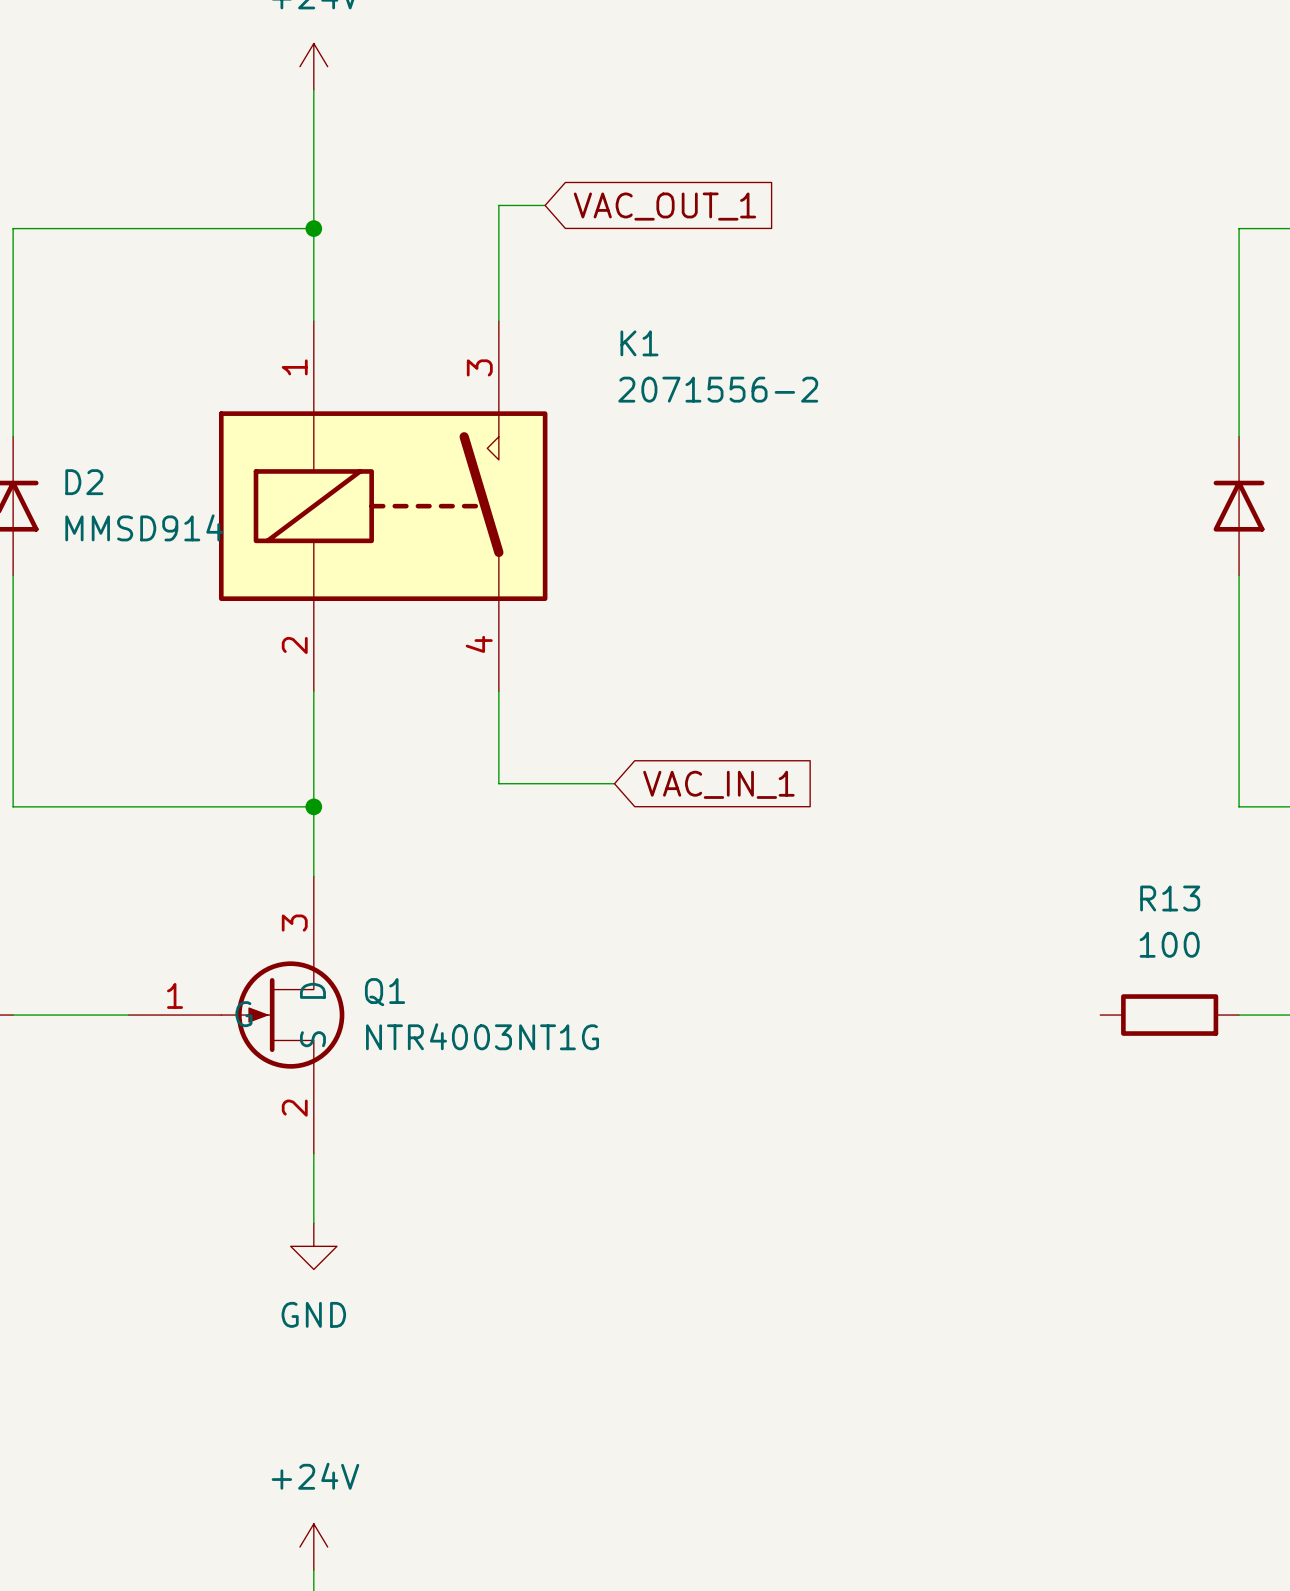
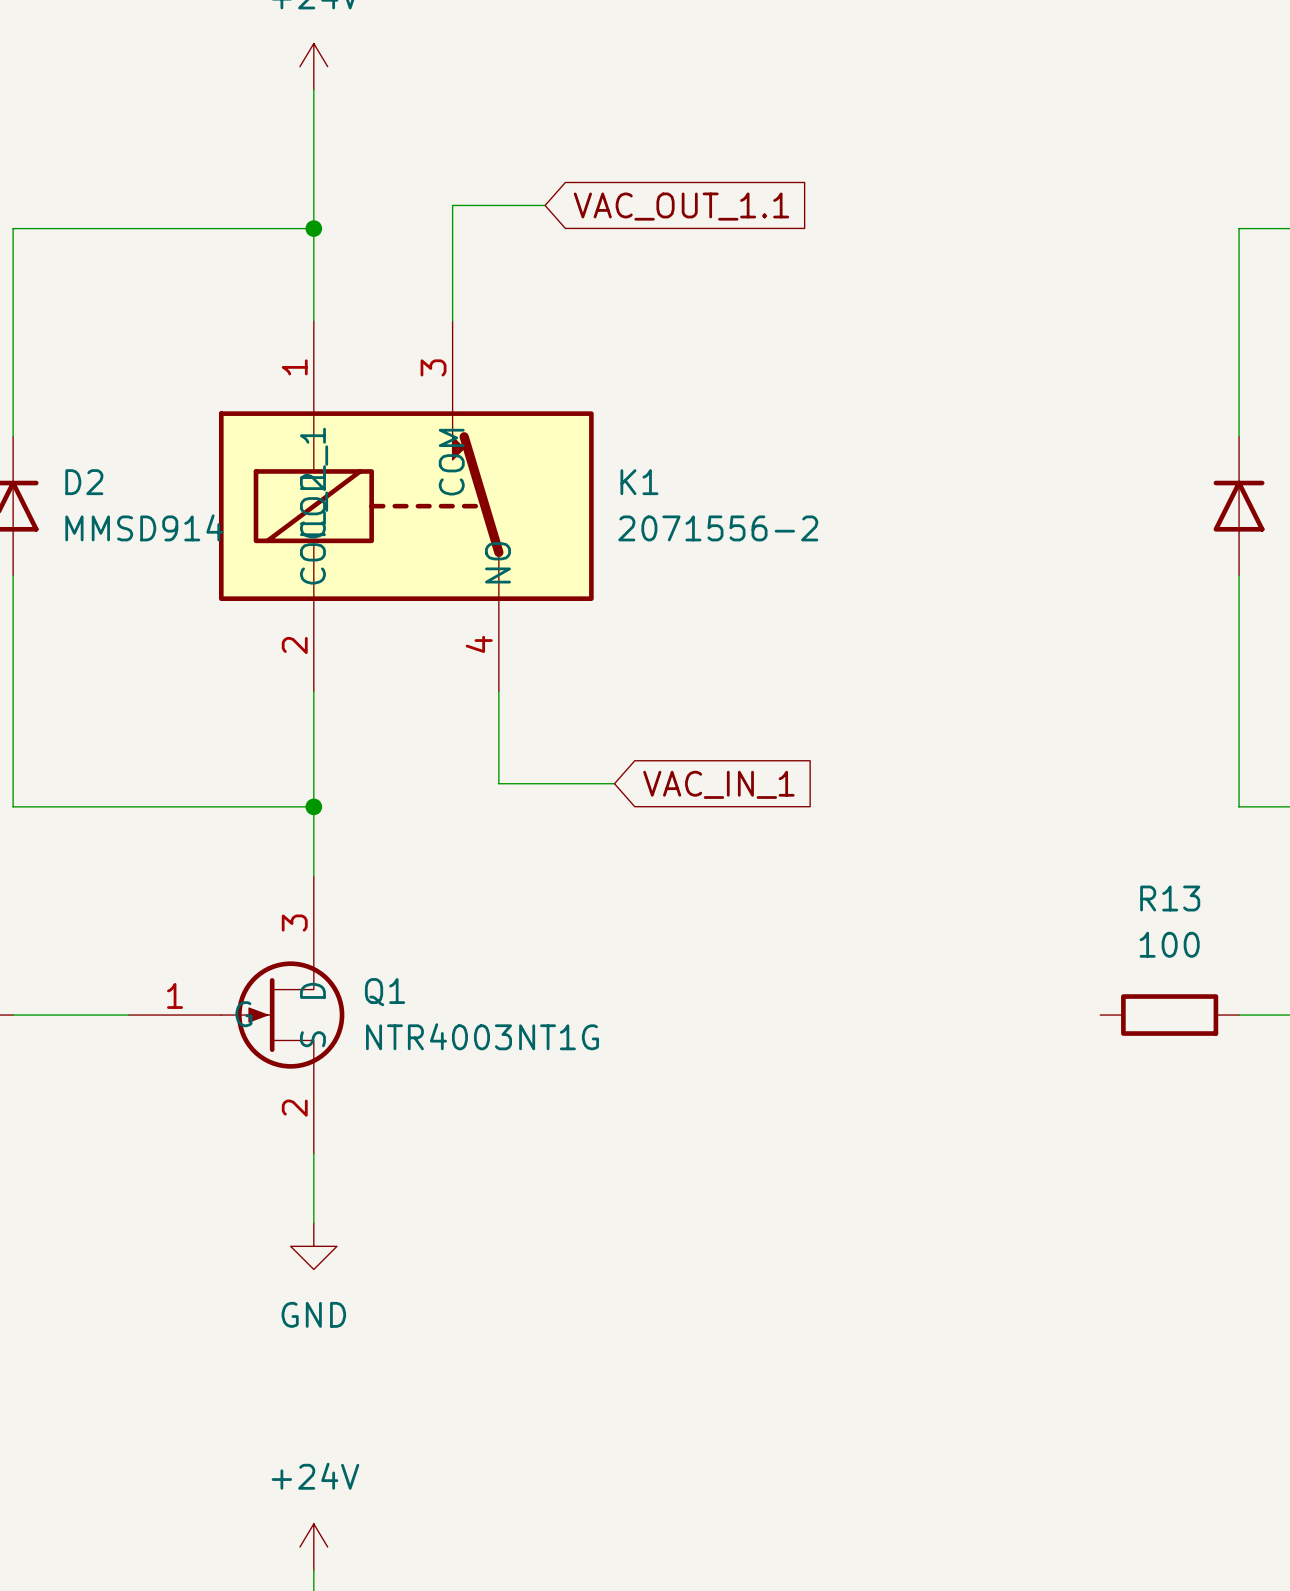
wire: (498, 205) (498, 321) -> (498, 205) (452, 205) (452, 321)
global label: VAC_OUT_1 (664, 206) -> VAC_OUT_1.1 (681, 206)
K1 symbol: [218, 321, 548, 692] -> [218, 321, 594, 692]
K1 name position: K1 (639, 343) -> K1 (639, 482)
K1 value position: 2071556-2 (718, 389) -> 2071556-2 (718, 528)

